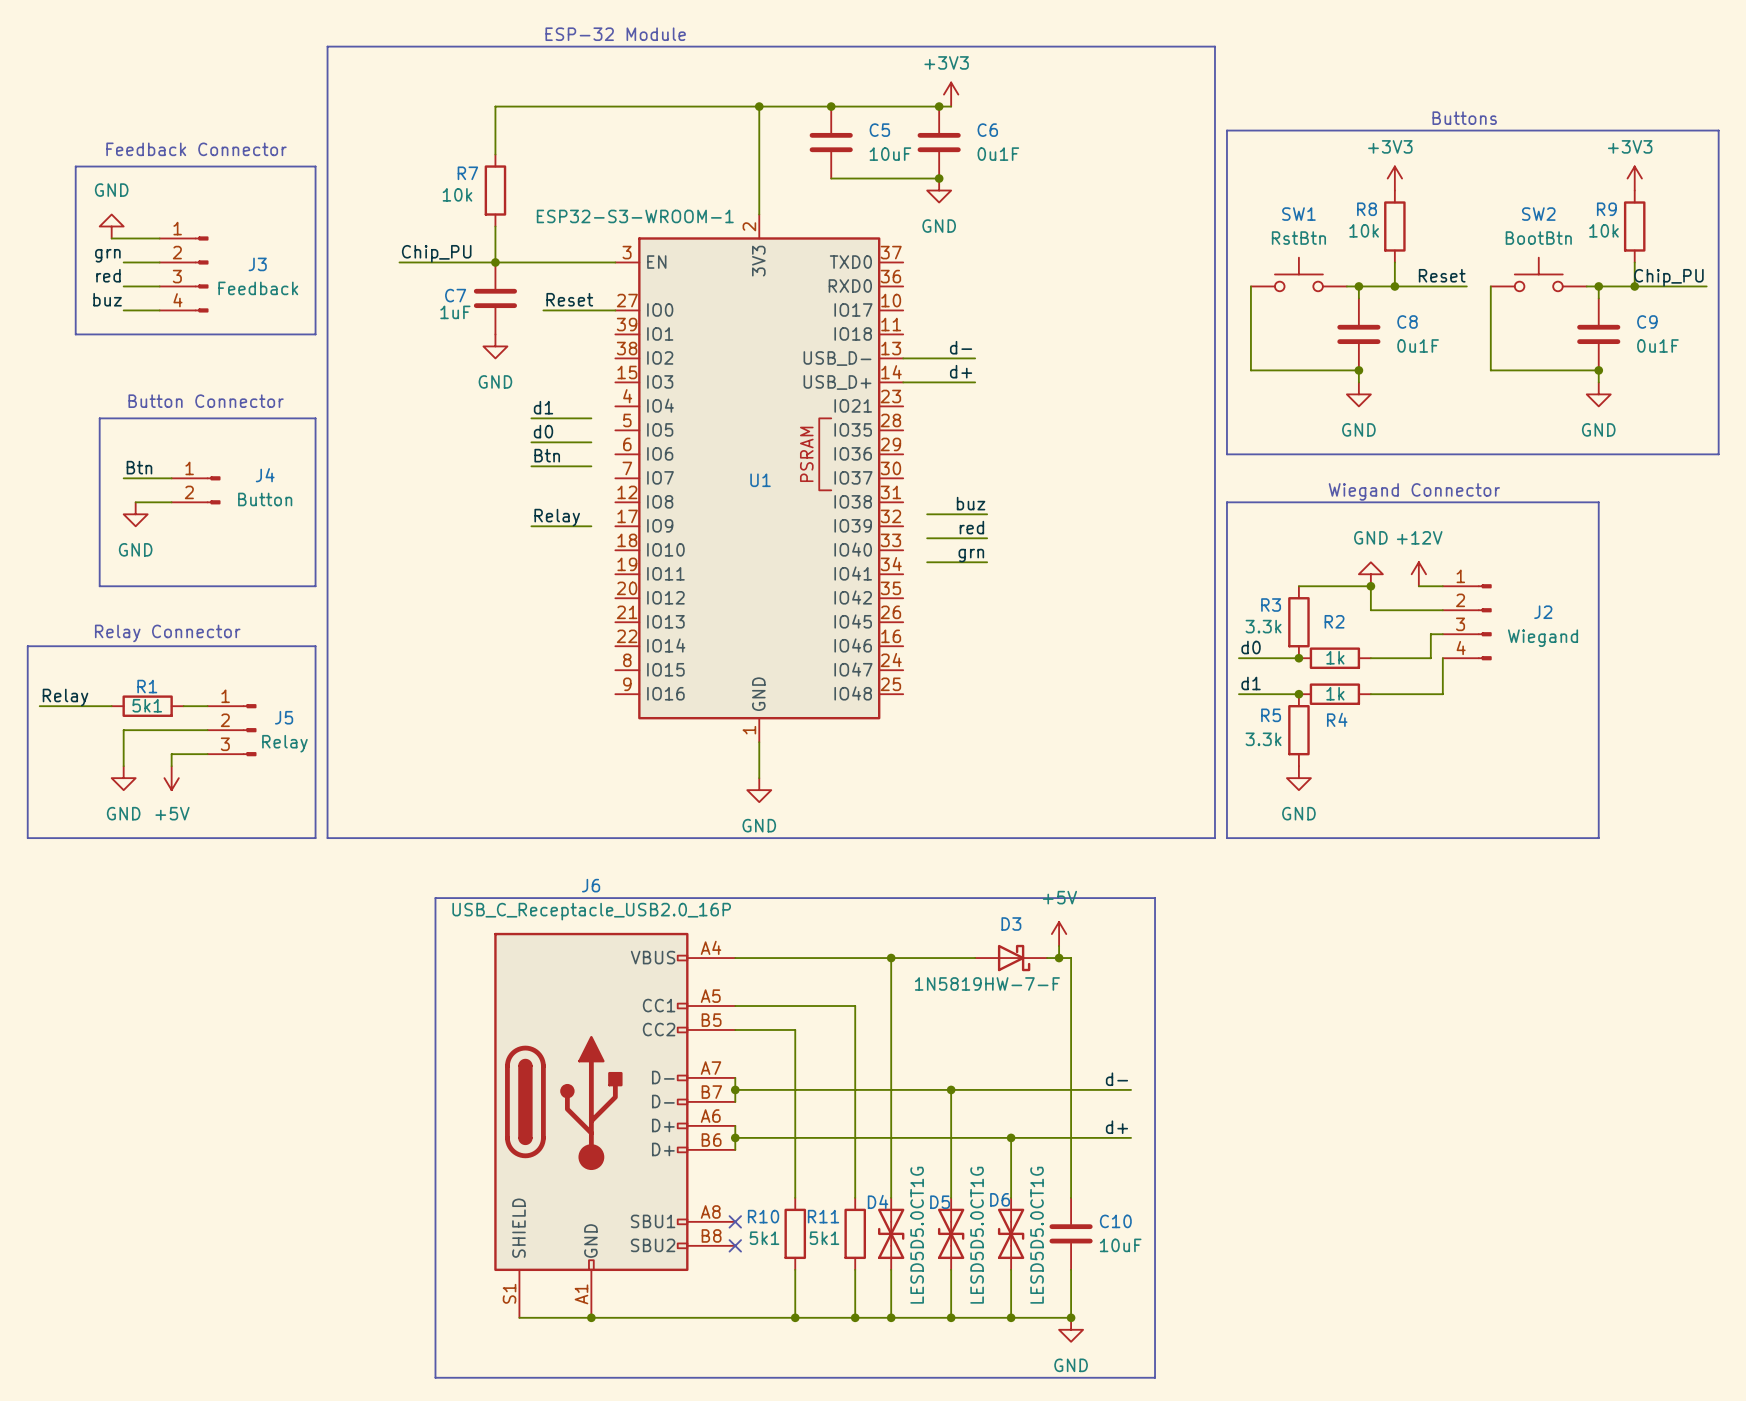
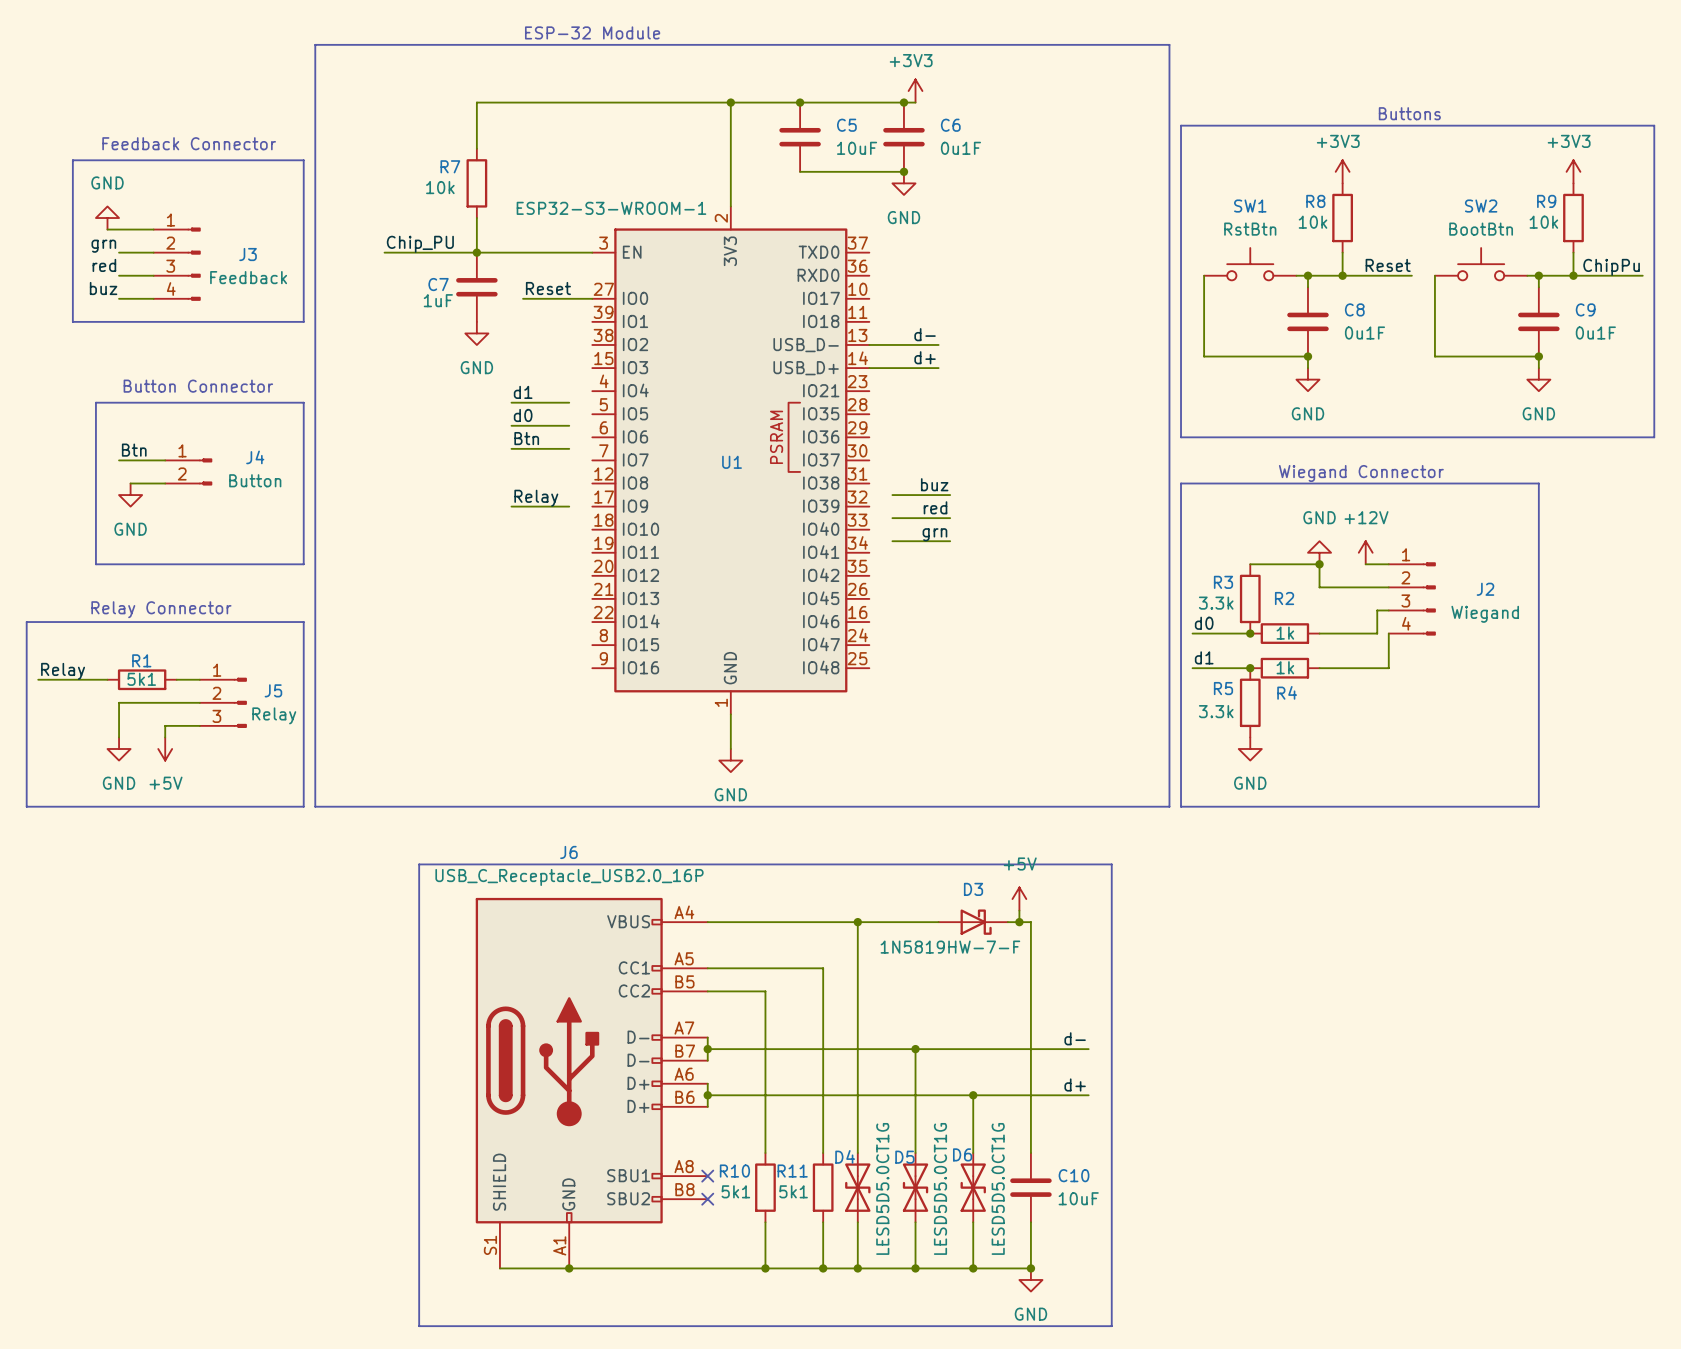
label: Chip_PU (1668, 277) -> ChipPu (1611, 267)

